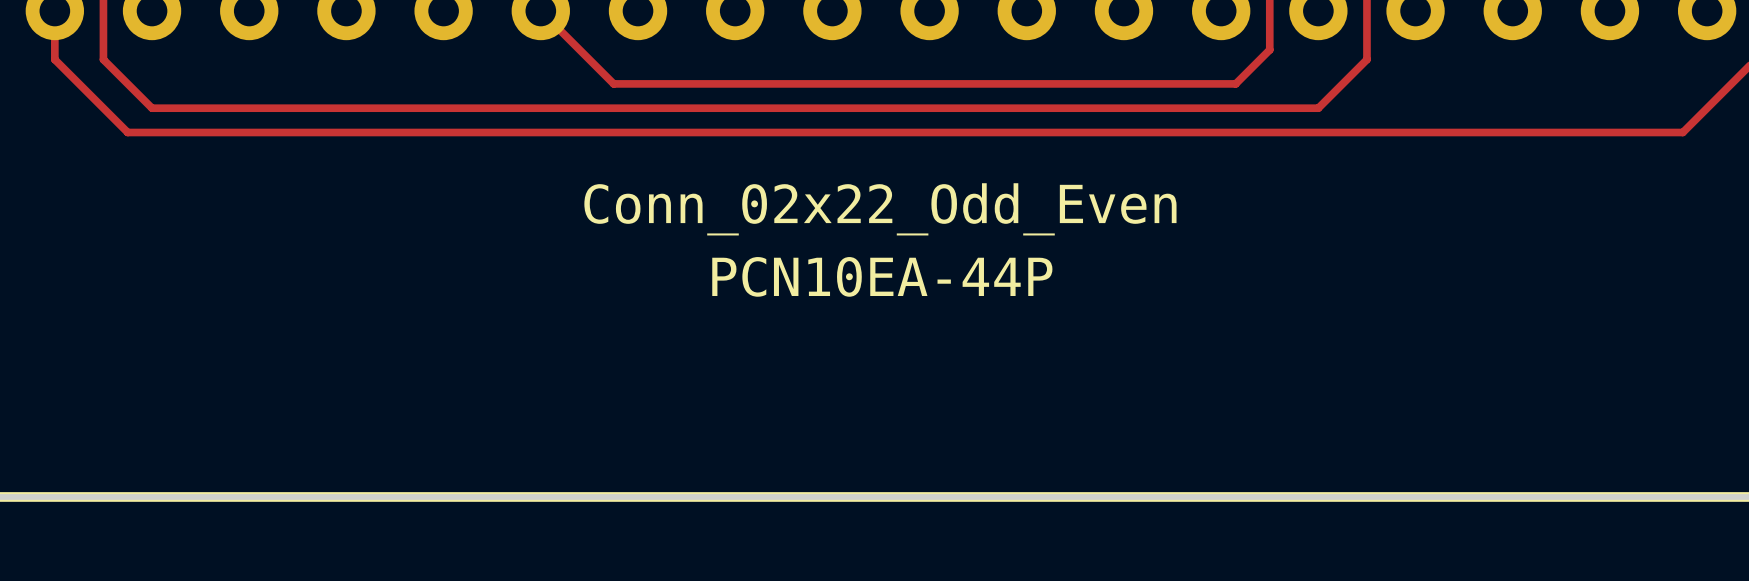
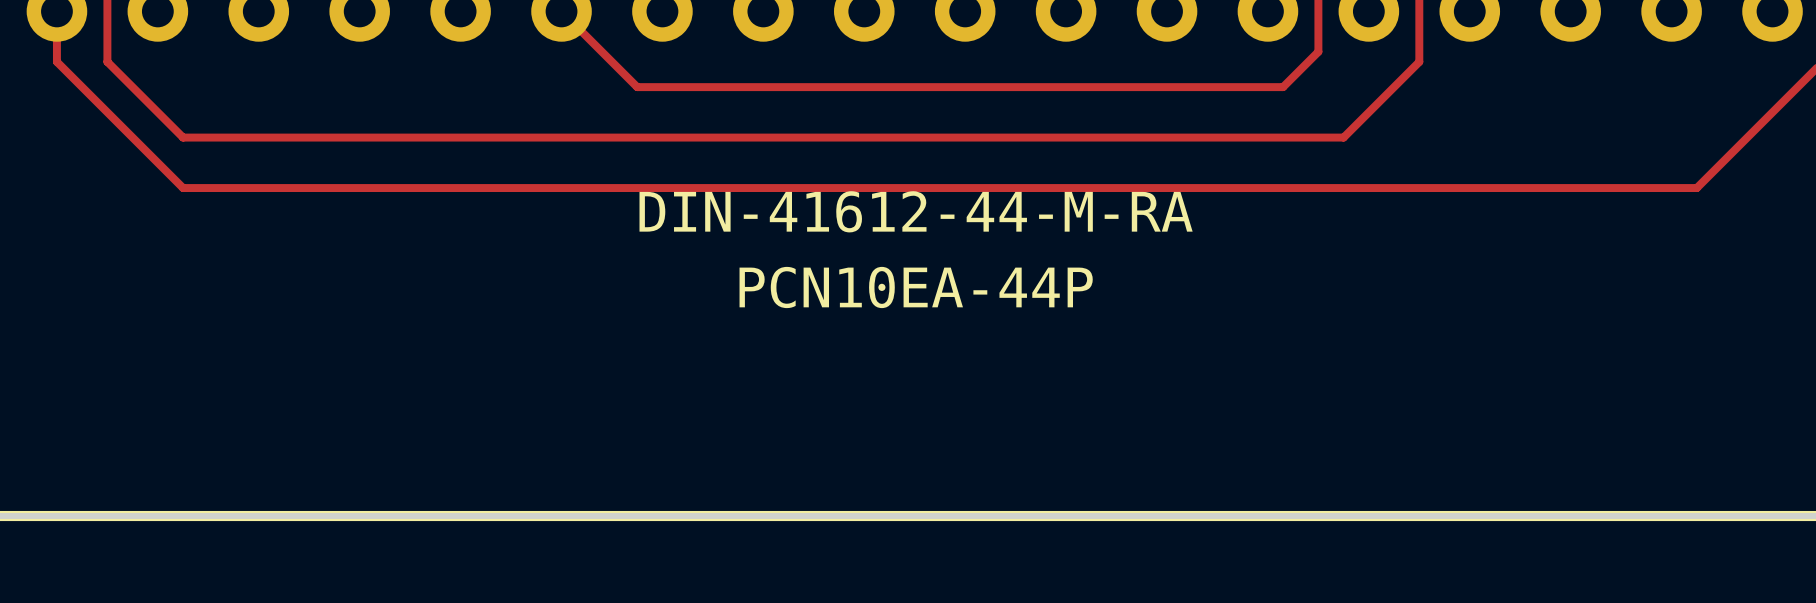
top track: (152, 108) (1318, 108) -> none
top track: (127, 132) (176, 132) -> (157, 112) (183, 137)
top track: none -> (132, 137) (183, 188) (1696, 188) (1747, 137)
top track: (1294, 132) (1682, 132) -> (1343, 137) (1368, 112)
part value: Conn_02x22_Odd_Even (880, 209) -> DIN-41612-44-M-RA (916, 211)

